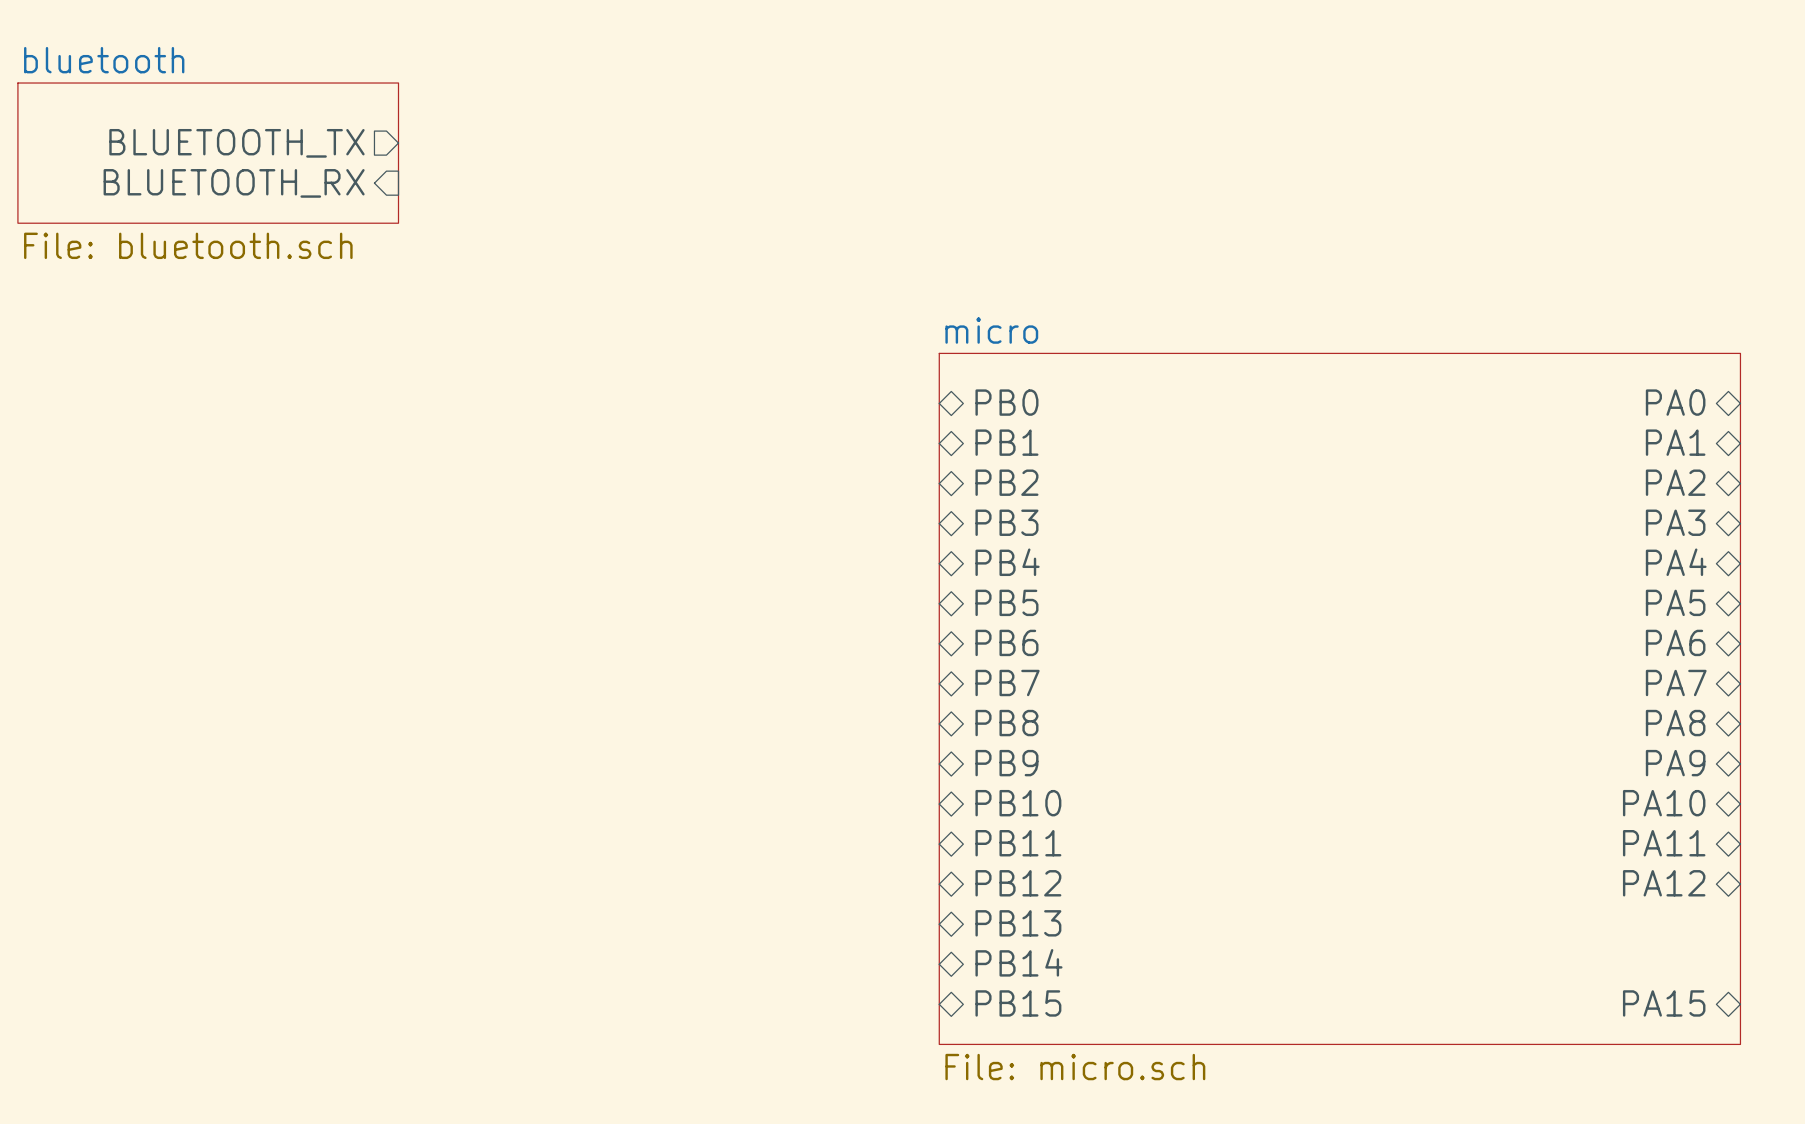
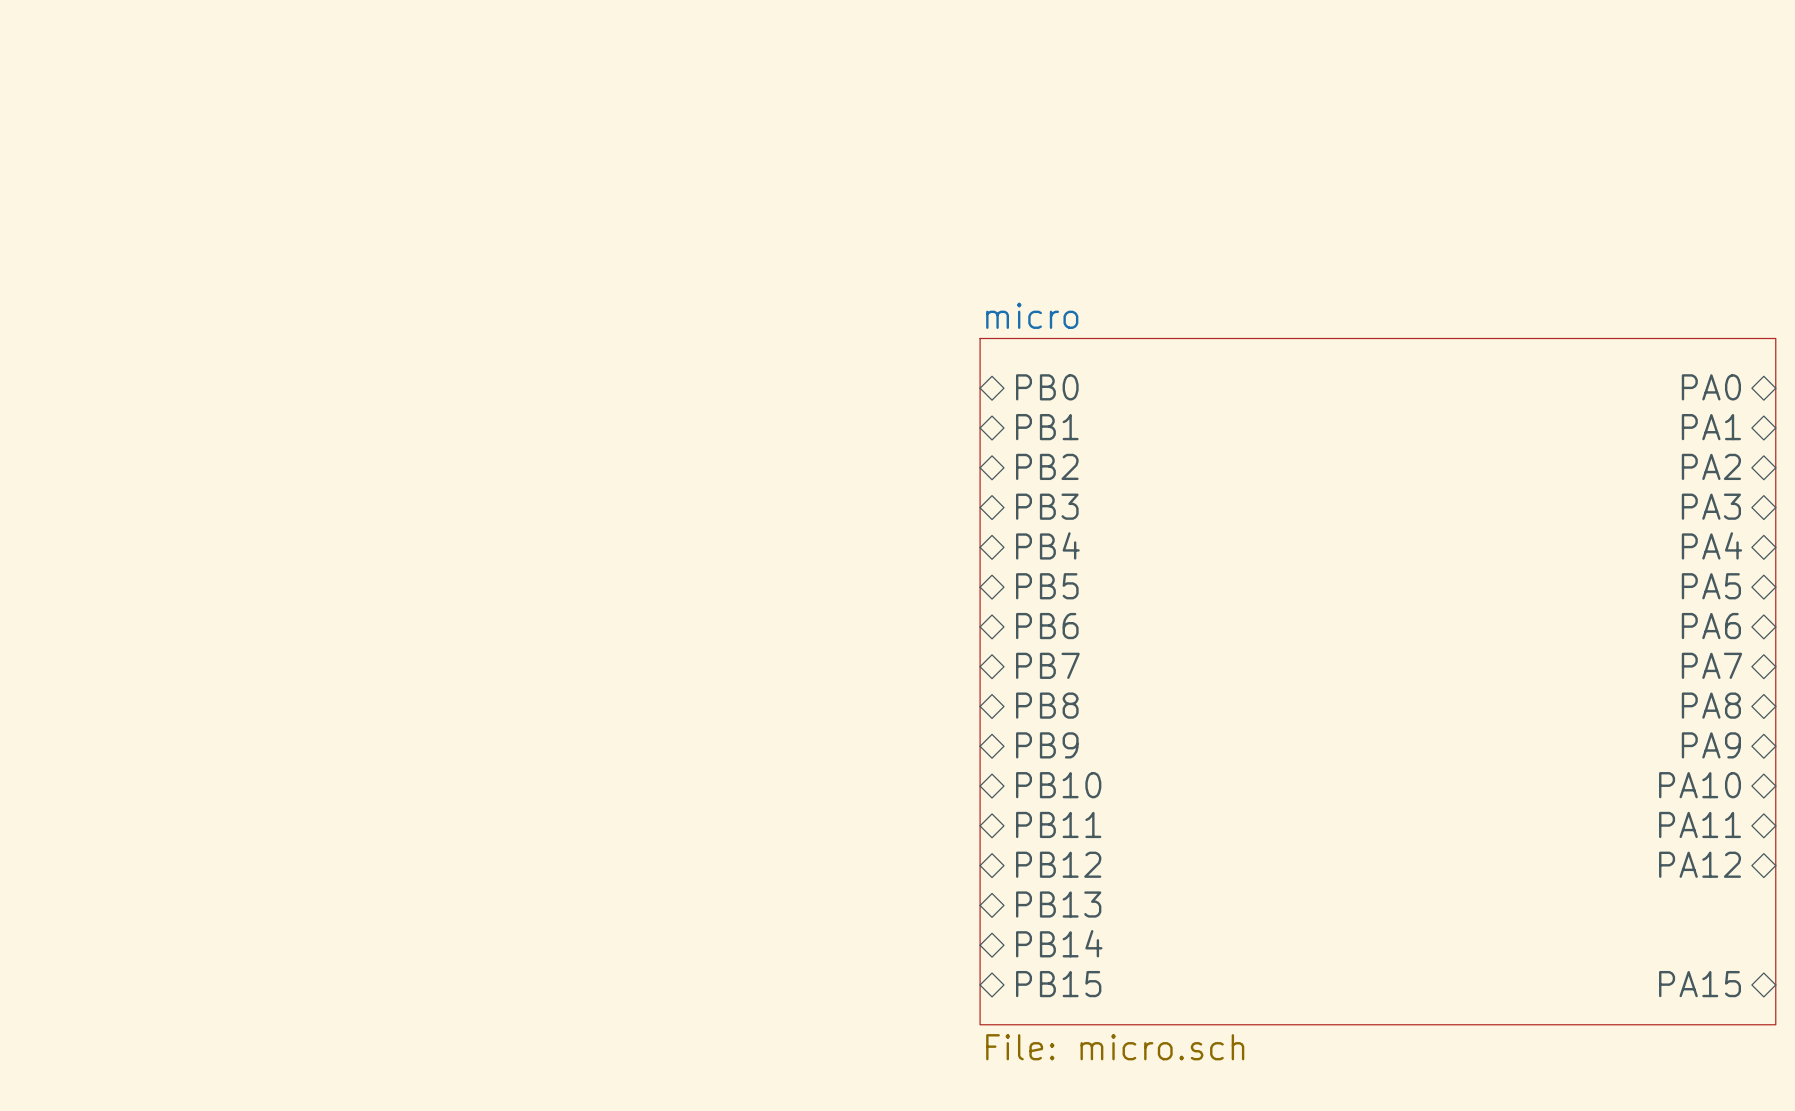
sheet pin: BLUETOOTH_TX (236, 143) -> none
sheet bluetooth: File: bluetooth.sch (208, 153) -> none
sheet pin: BLUETOOTH_RX (234, 183) -> none

